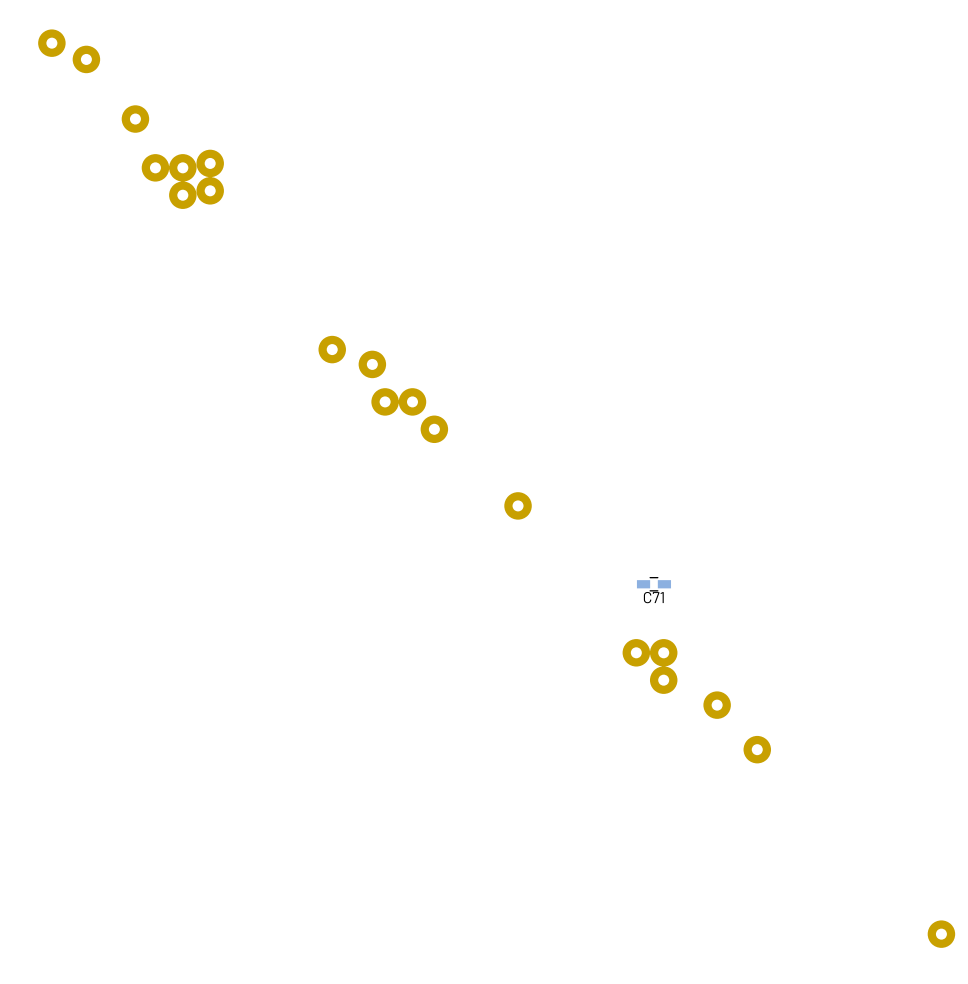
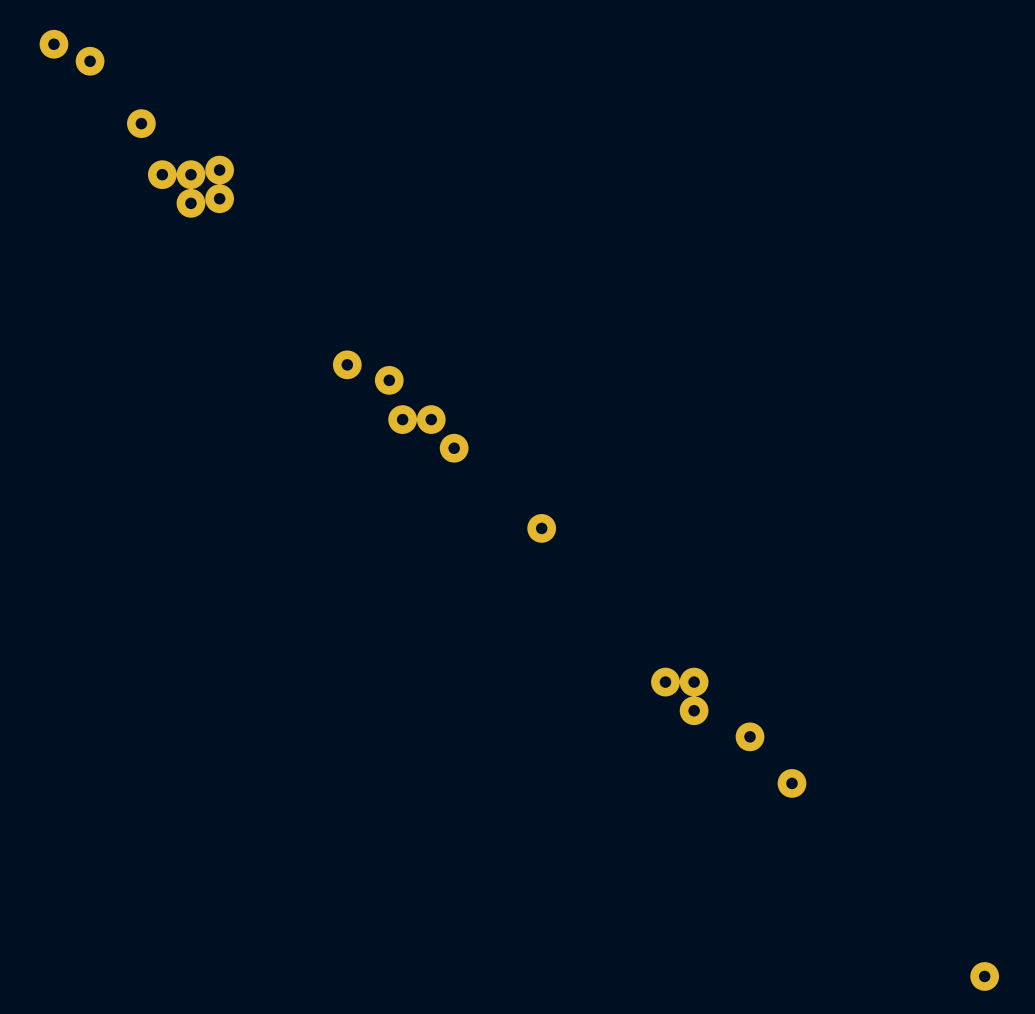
C71: (653, 584) -> none

